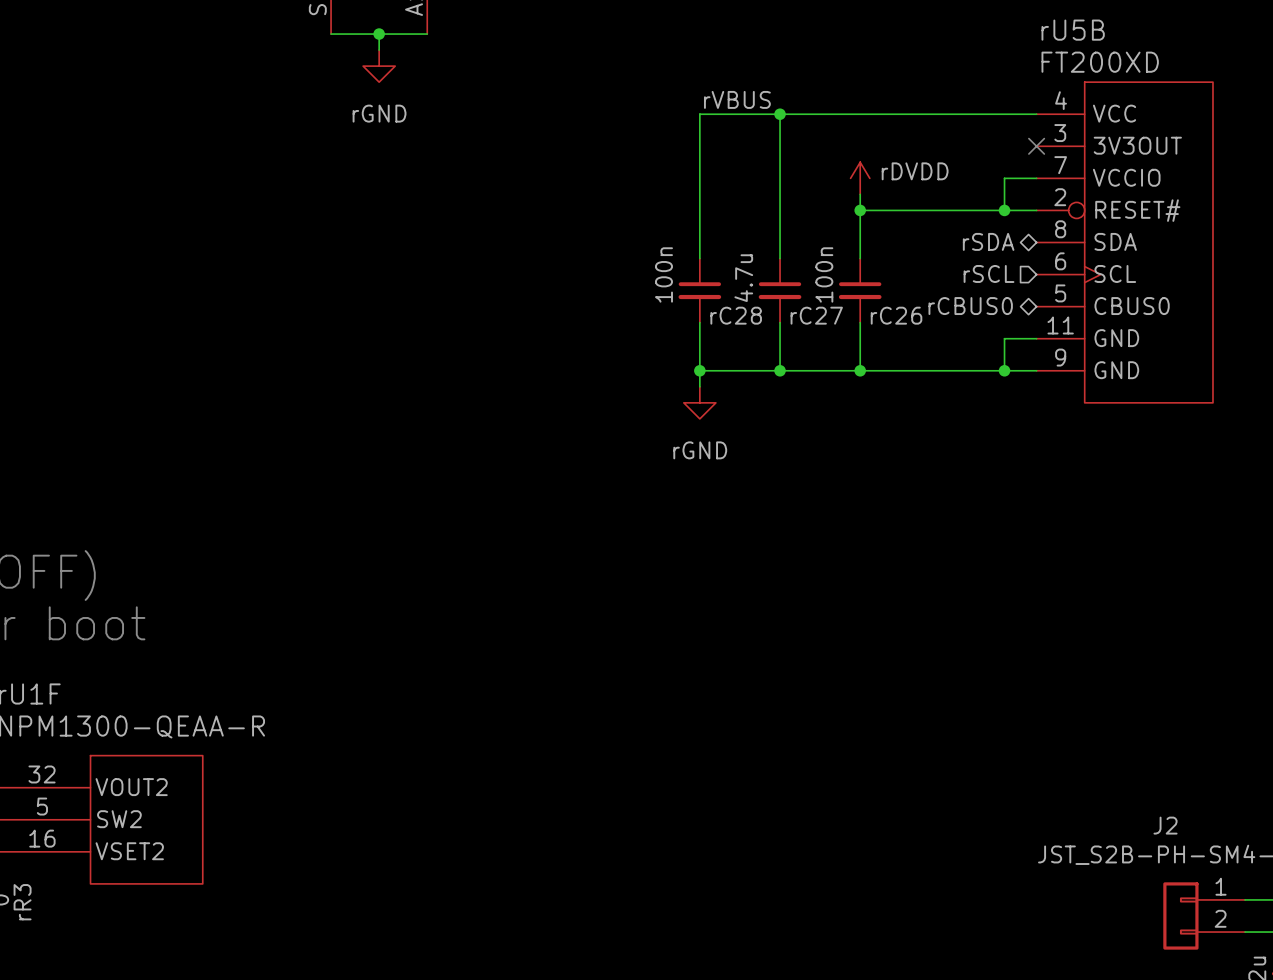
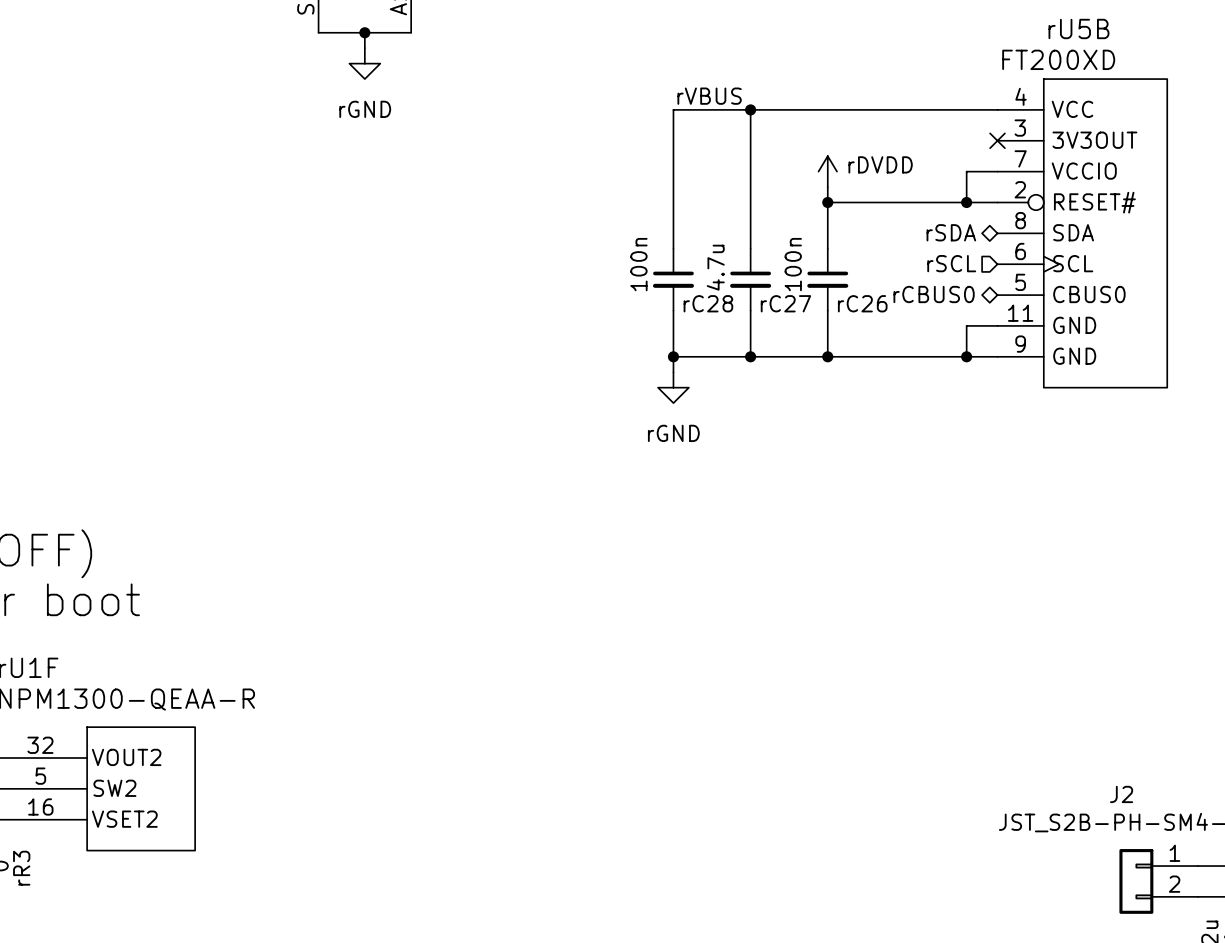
rU5B name position: rU5B (1073, 30) -> rU5B (1078, 28)

